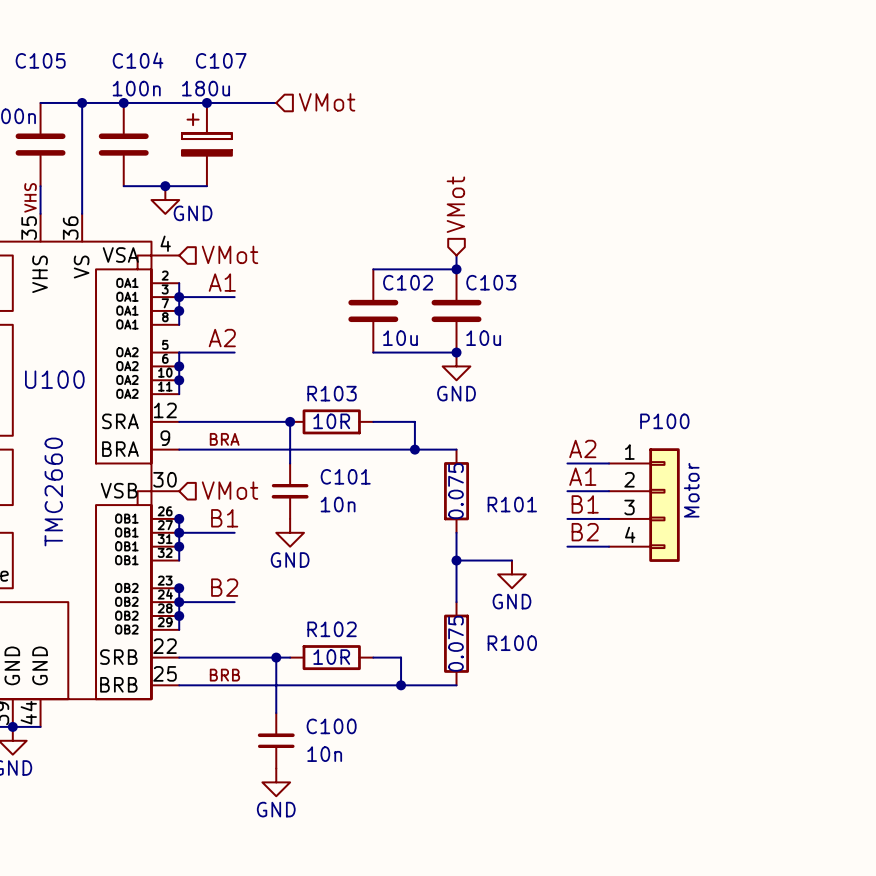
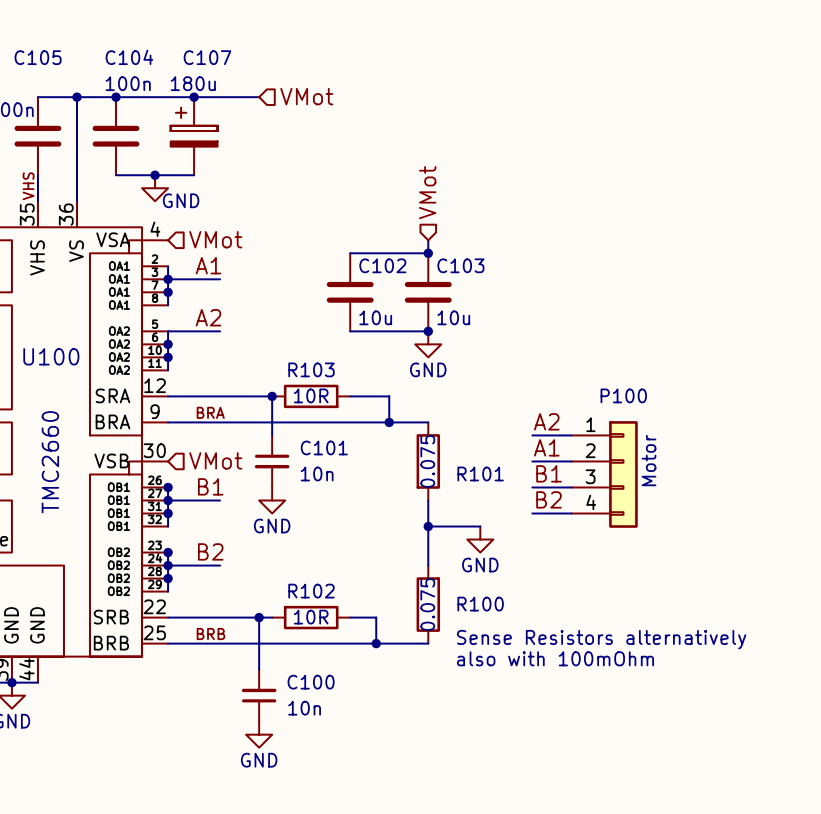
text: none -> Sense Resistors alternatively (601, 639)
text: none -> also with 100mOhm (555, 658)

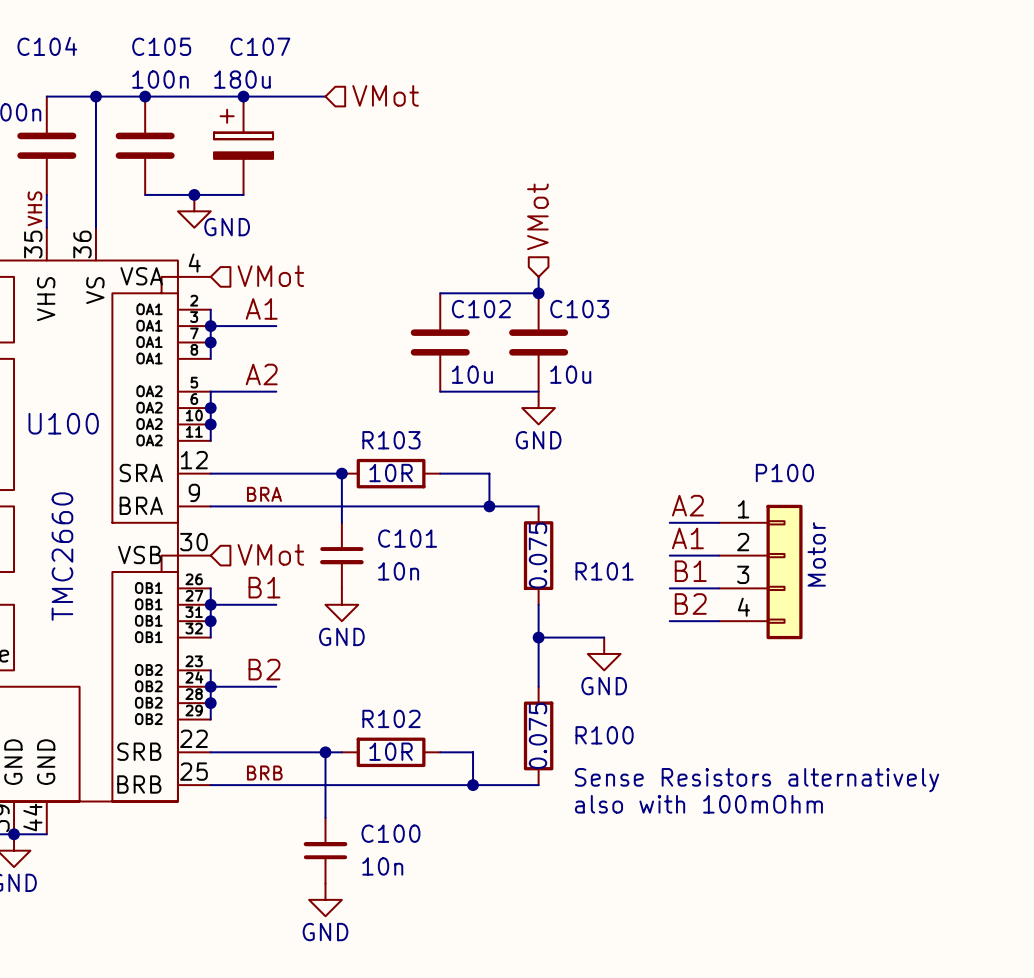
C105 name: C105 (38, 57) -> C104 (47, 46)
C104 name: C104 (129, 57) -> C105 (161, 46)
junction: (428, 331) -> none
junction: (168, 487) -> none
junction: (168, 552) -> none

